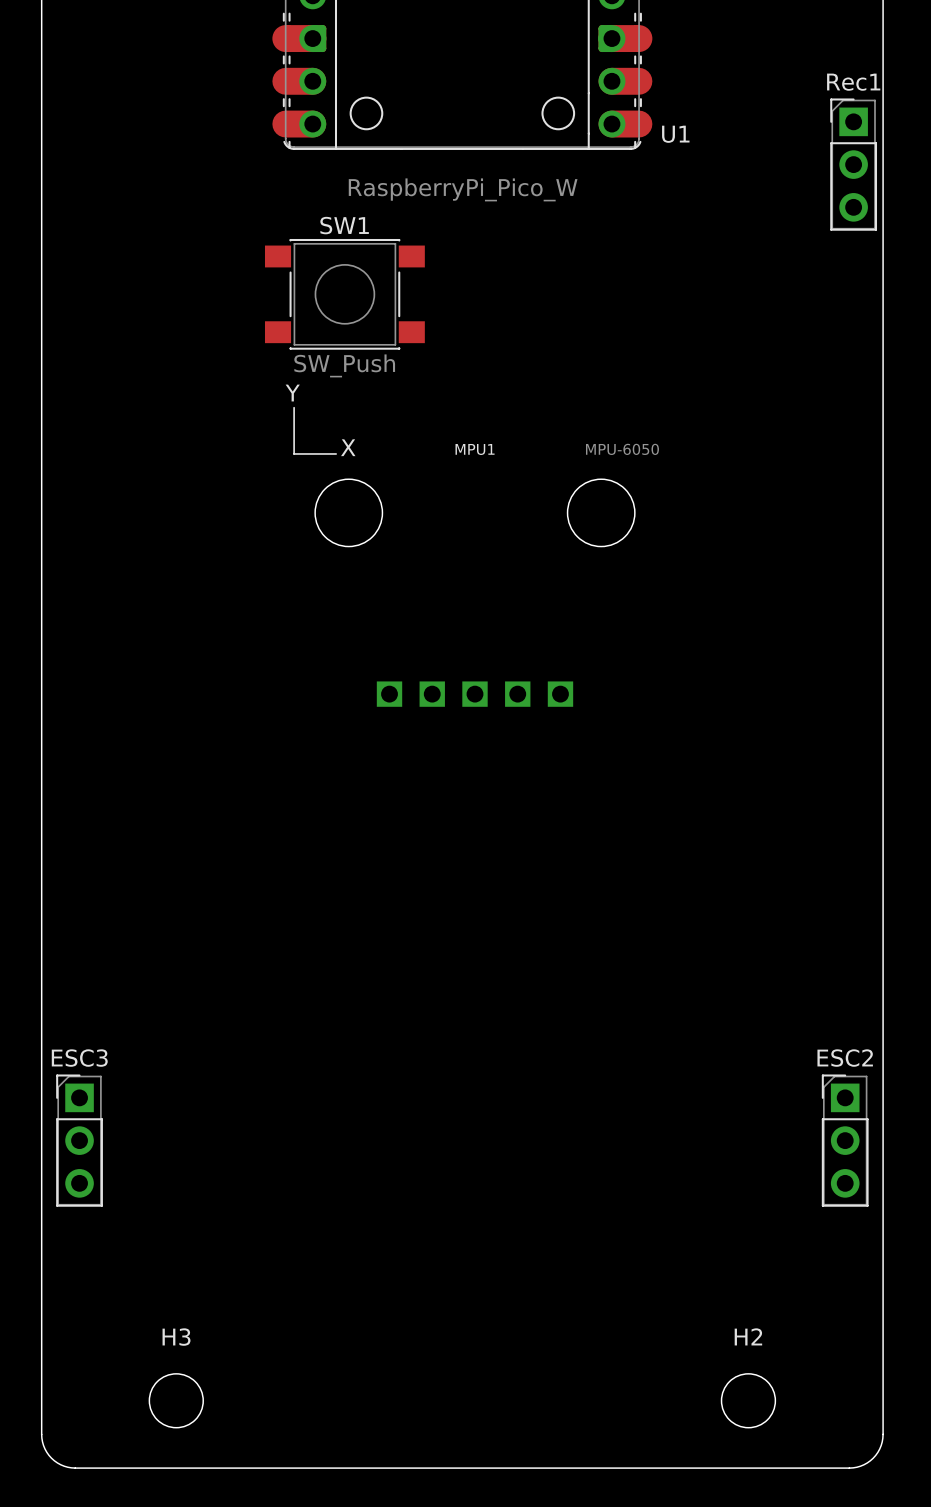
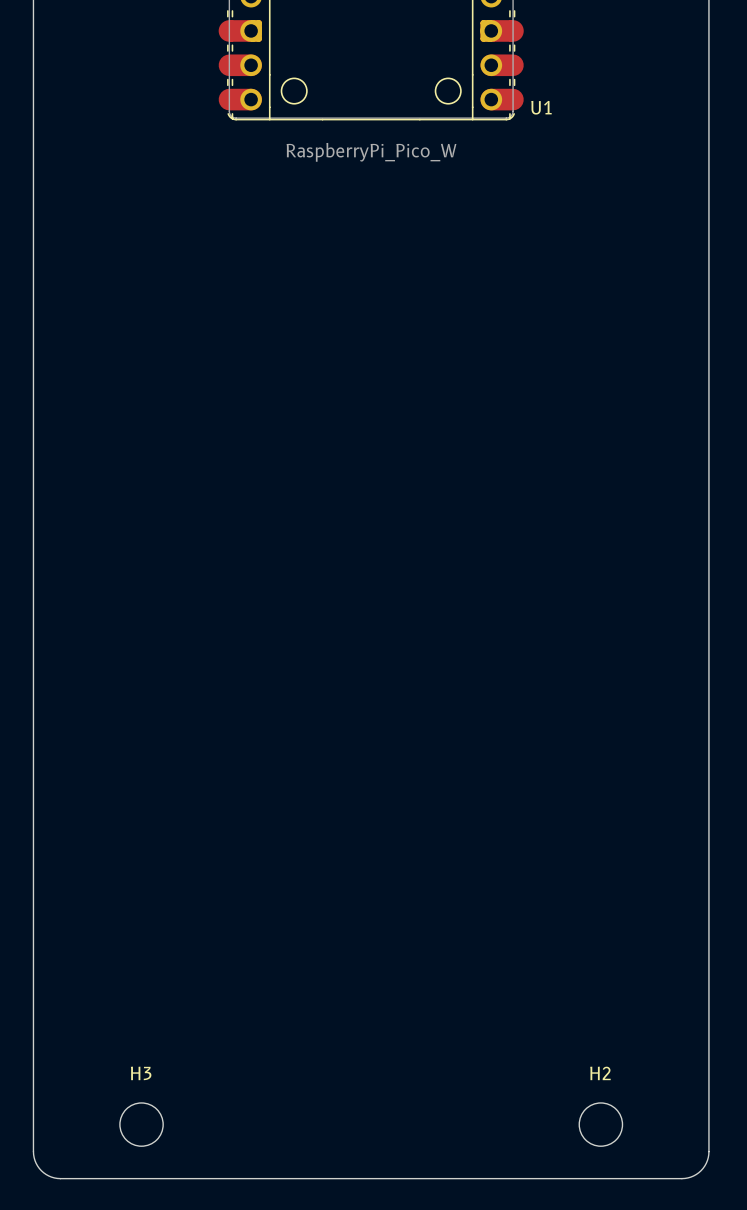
Rec1: (853, 164) -> none
SW1: SW_Push (344, 294) -> none
MPU1: MPU-6050 (464, 556) -> none
ESC3: (79, 1140) -> none
ESC2: (845, 1140) -> none

